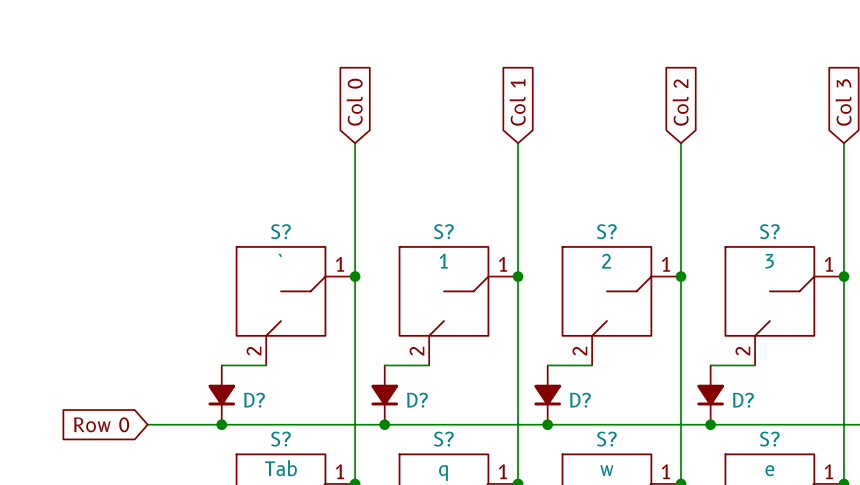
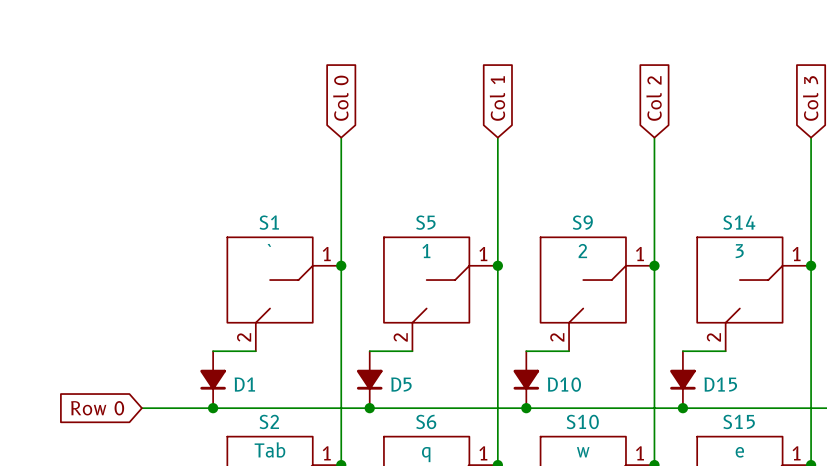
S? name: S? (280, 231) -> S1 (269, 222)
S? name: S? (443, 231) -> S5 (425, 222)
S? name: S? (606, 231) -> S9 (582, 222)
S? name: S? (769, 231) -> S14 (739, 222)
D? name: D? (254, 400) -> D1 (244, 384)
D? name: D? (417, 400) -> D5 (401, 384)
D? name: D? (580, 400) -> D10 (564, 384)
D? name: D? (743, 400) -> D15 (720, 384)
S? name: S? (280, 439) -> S2 (269, 421)
S? name: S? (443, 439) -> S6 (426, 421)
S? name: S? (606, 439) -> S10 (582, 421)
S? name: S? (769, 439) -> S15 (739, 421)

